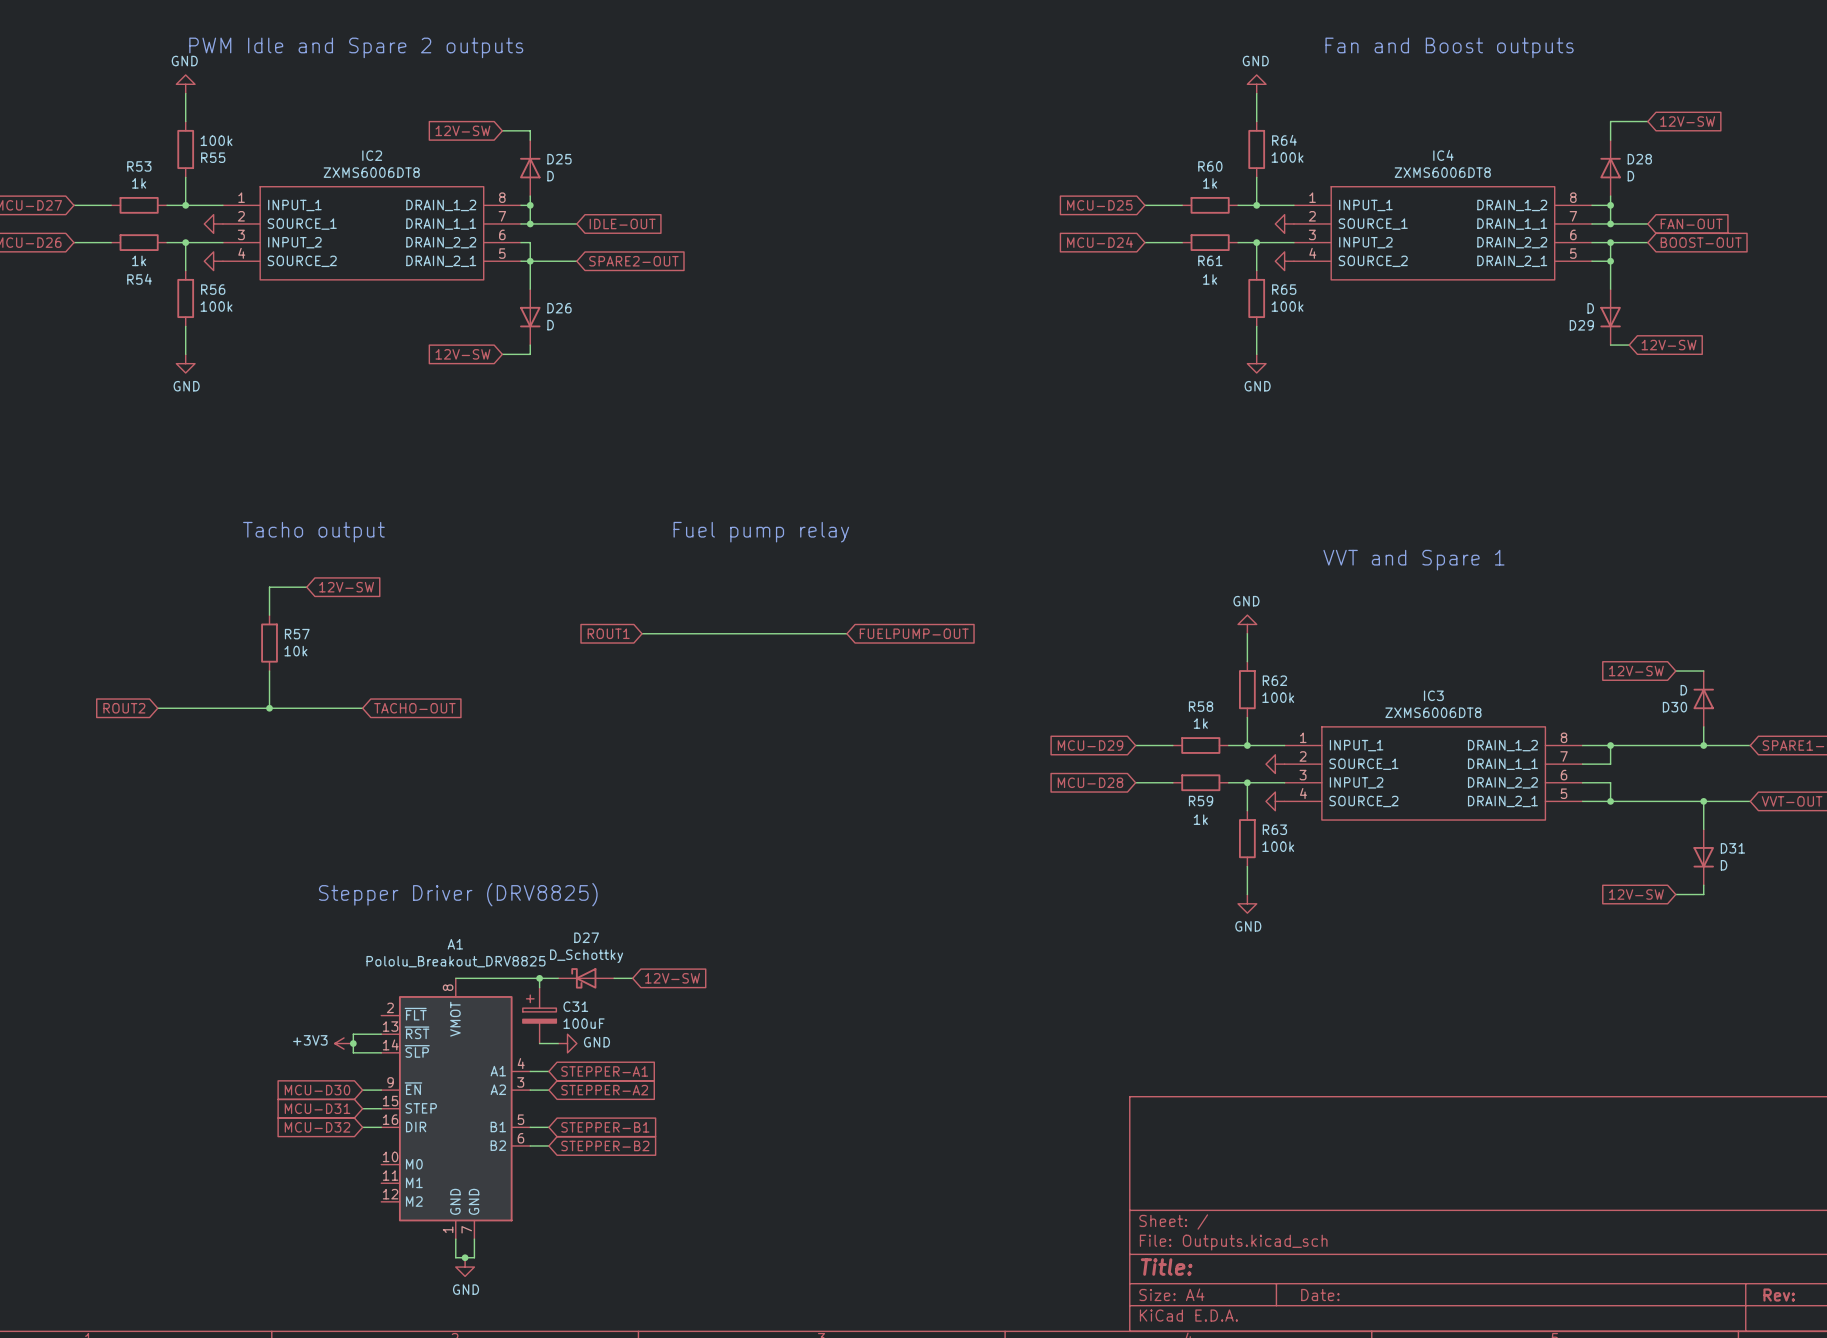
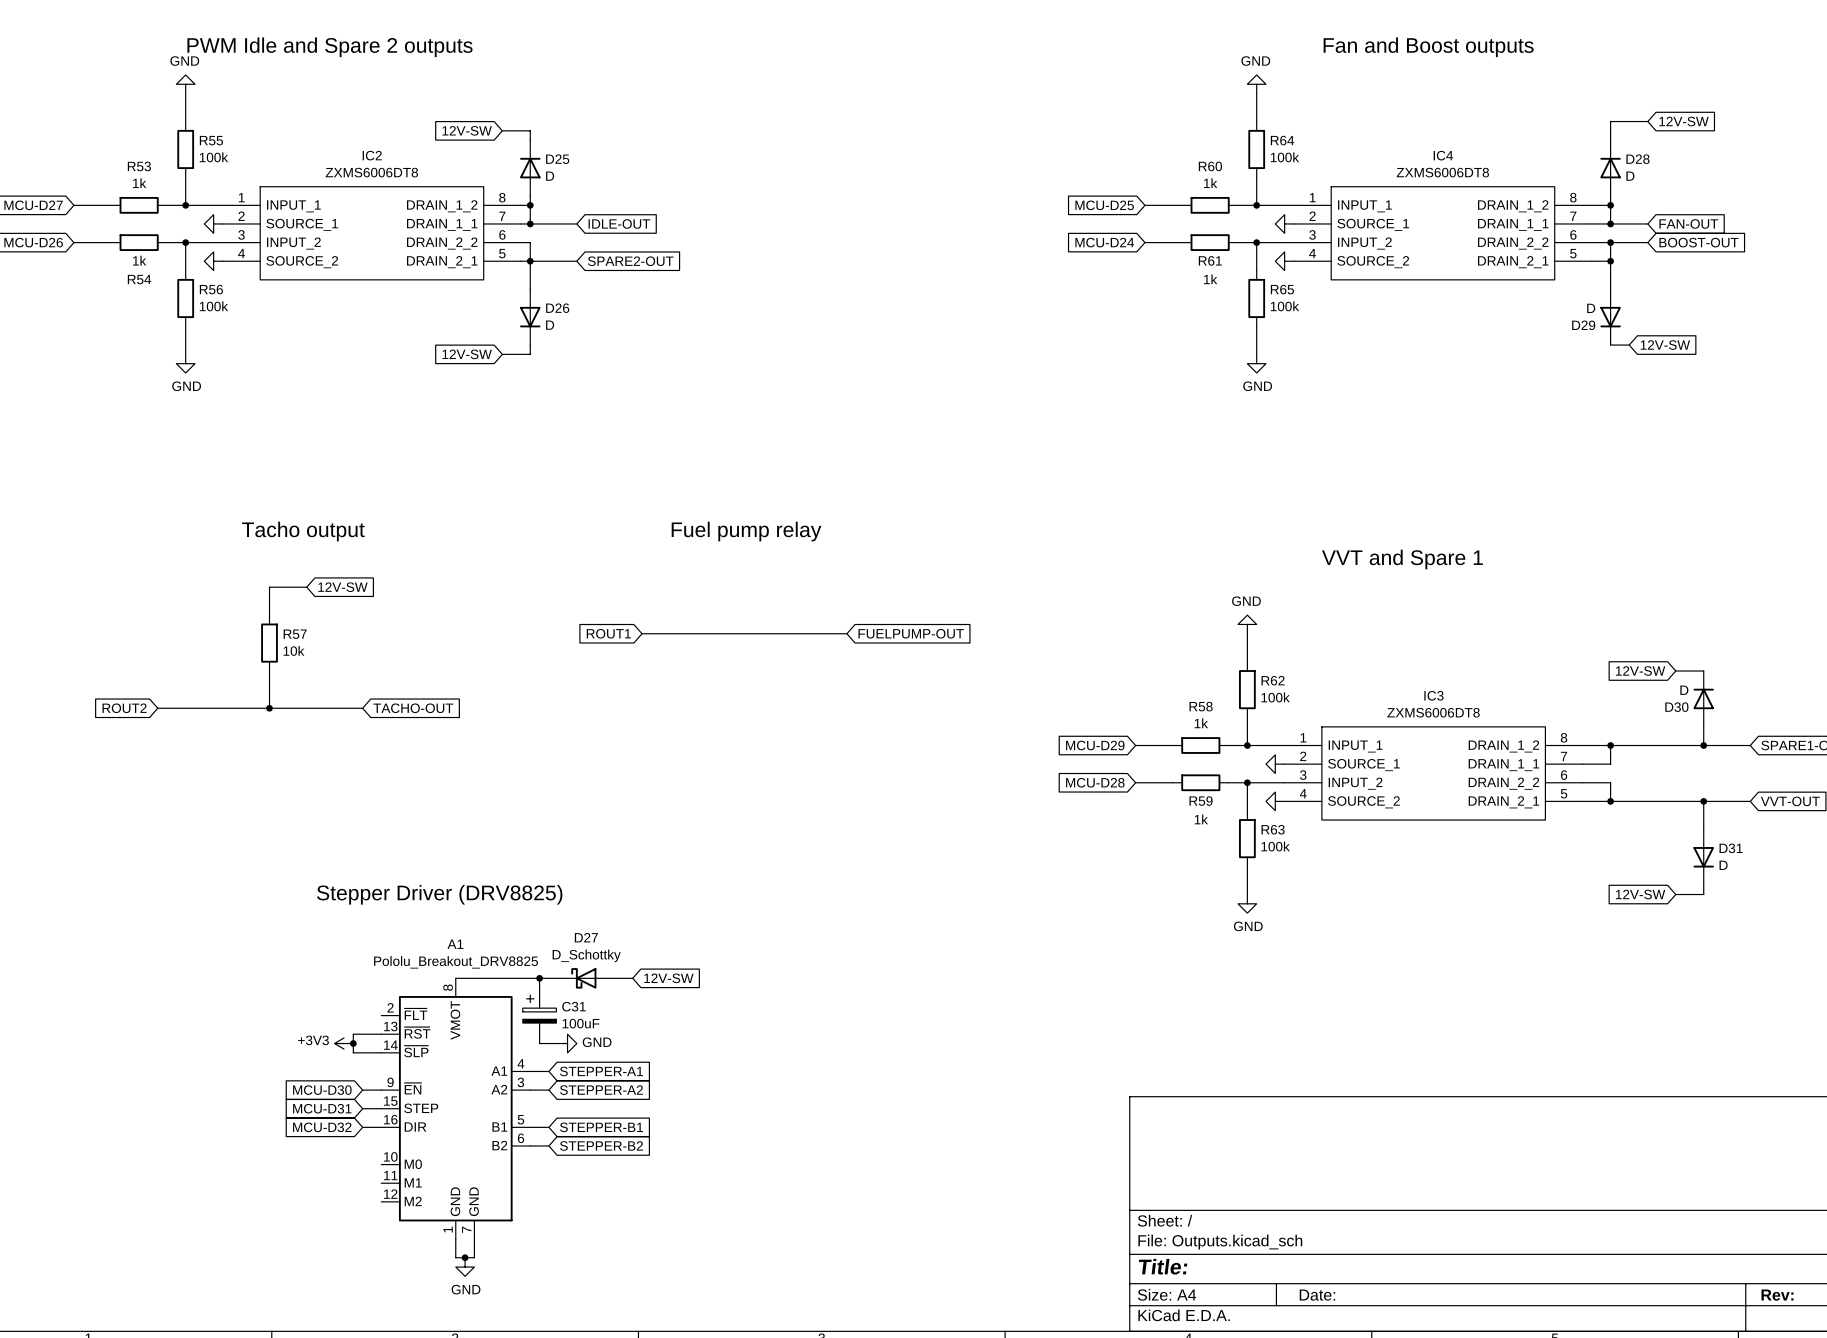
R55 value position: 100k (216, 140) -> 100k (213, 157)
R55 name position: R55 (213, 157) -> R55 (211, 140)

